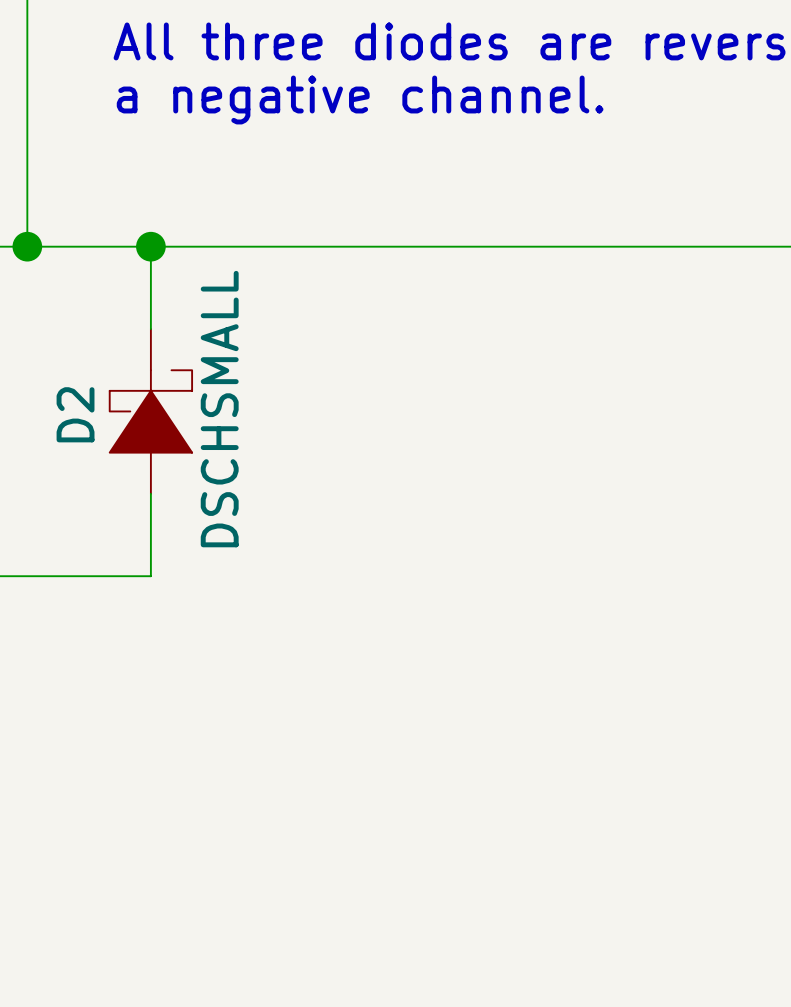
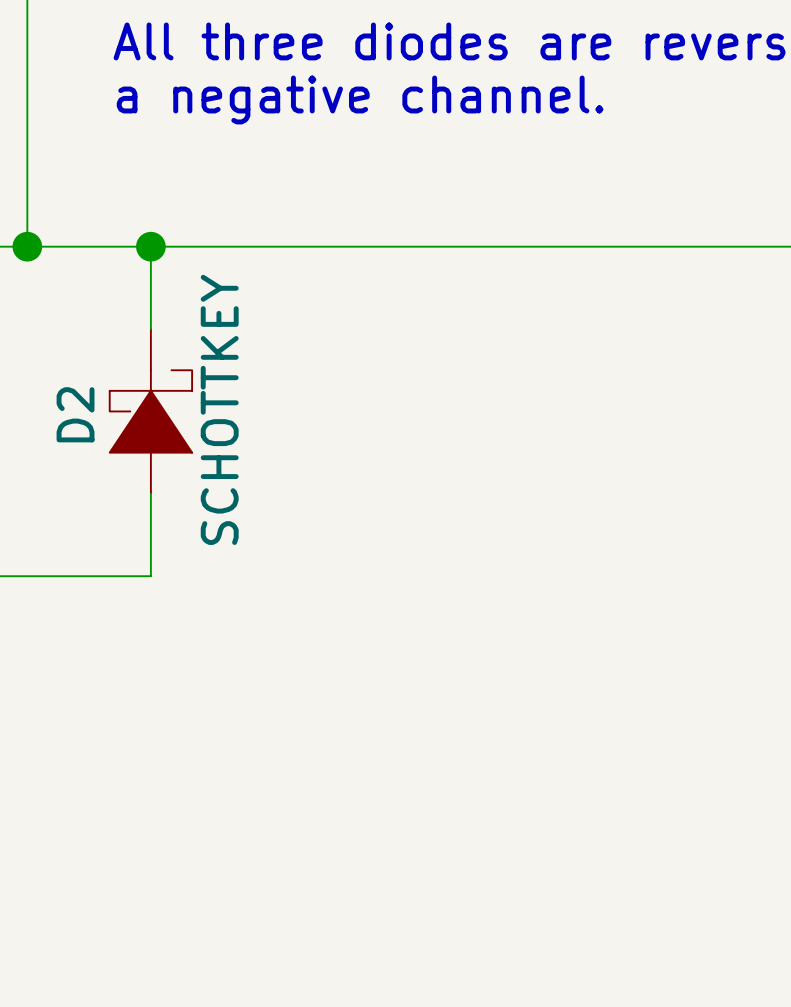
D2 value: DSCHSMALL (219, 409) -> SCHOTTKEY (219, 409)

